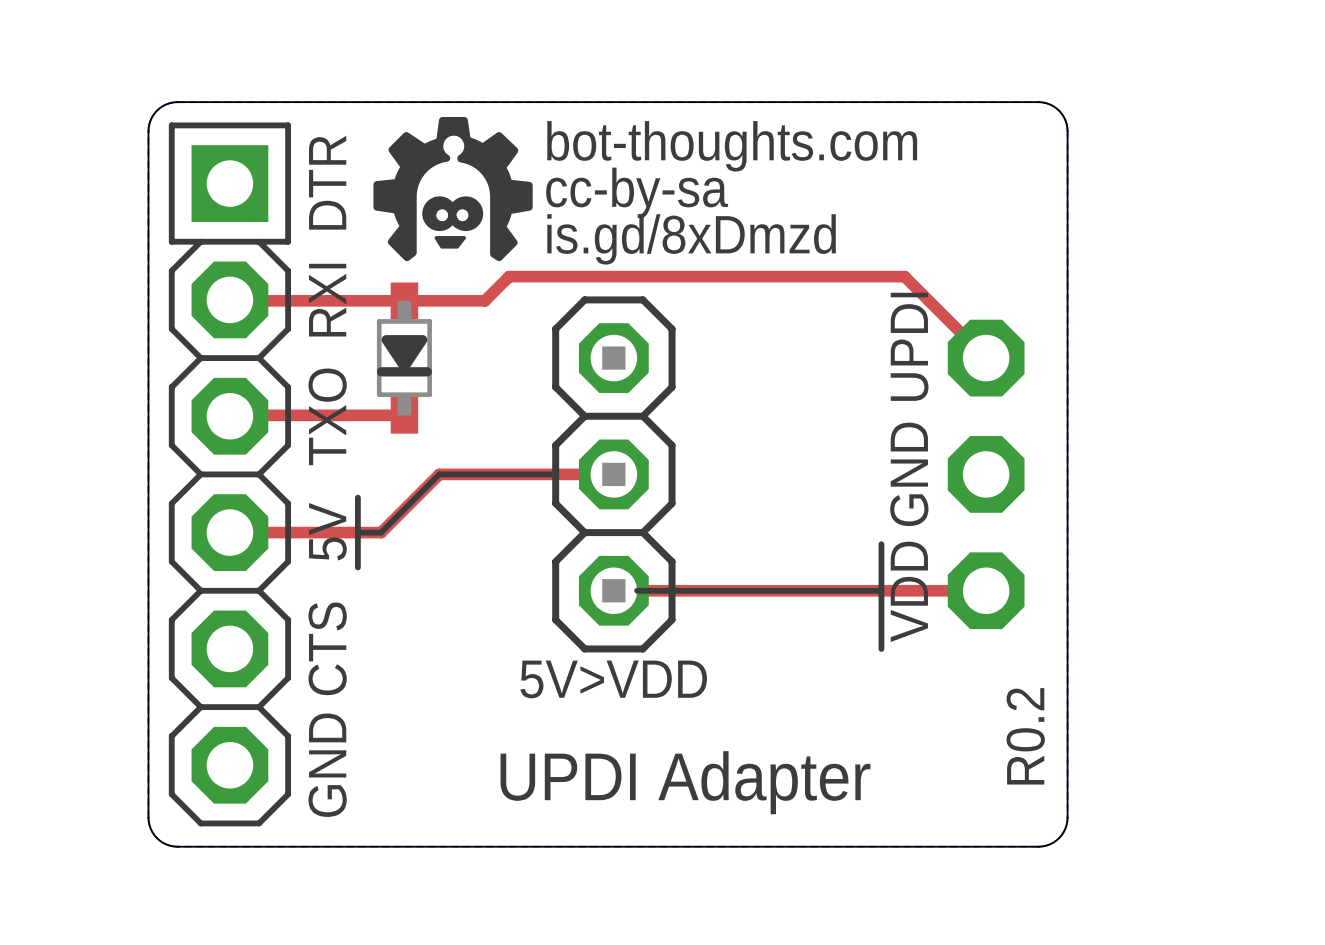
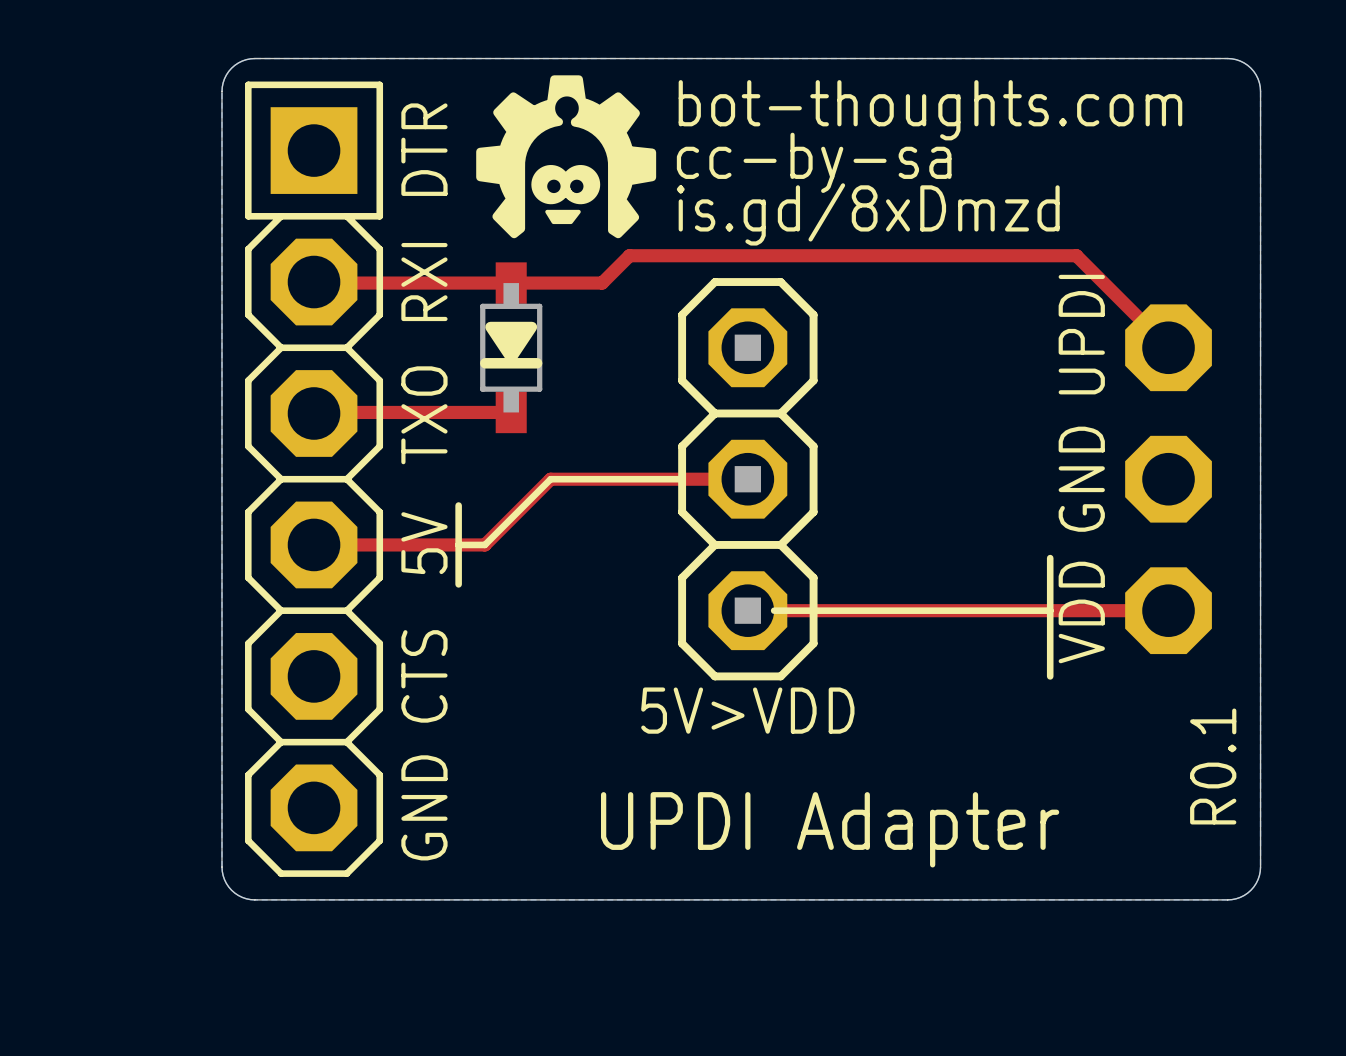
text: R0.2 (1025, 736) -> R0.1 (1213, 766)

